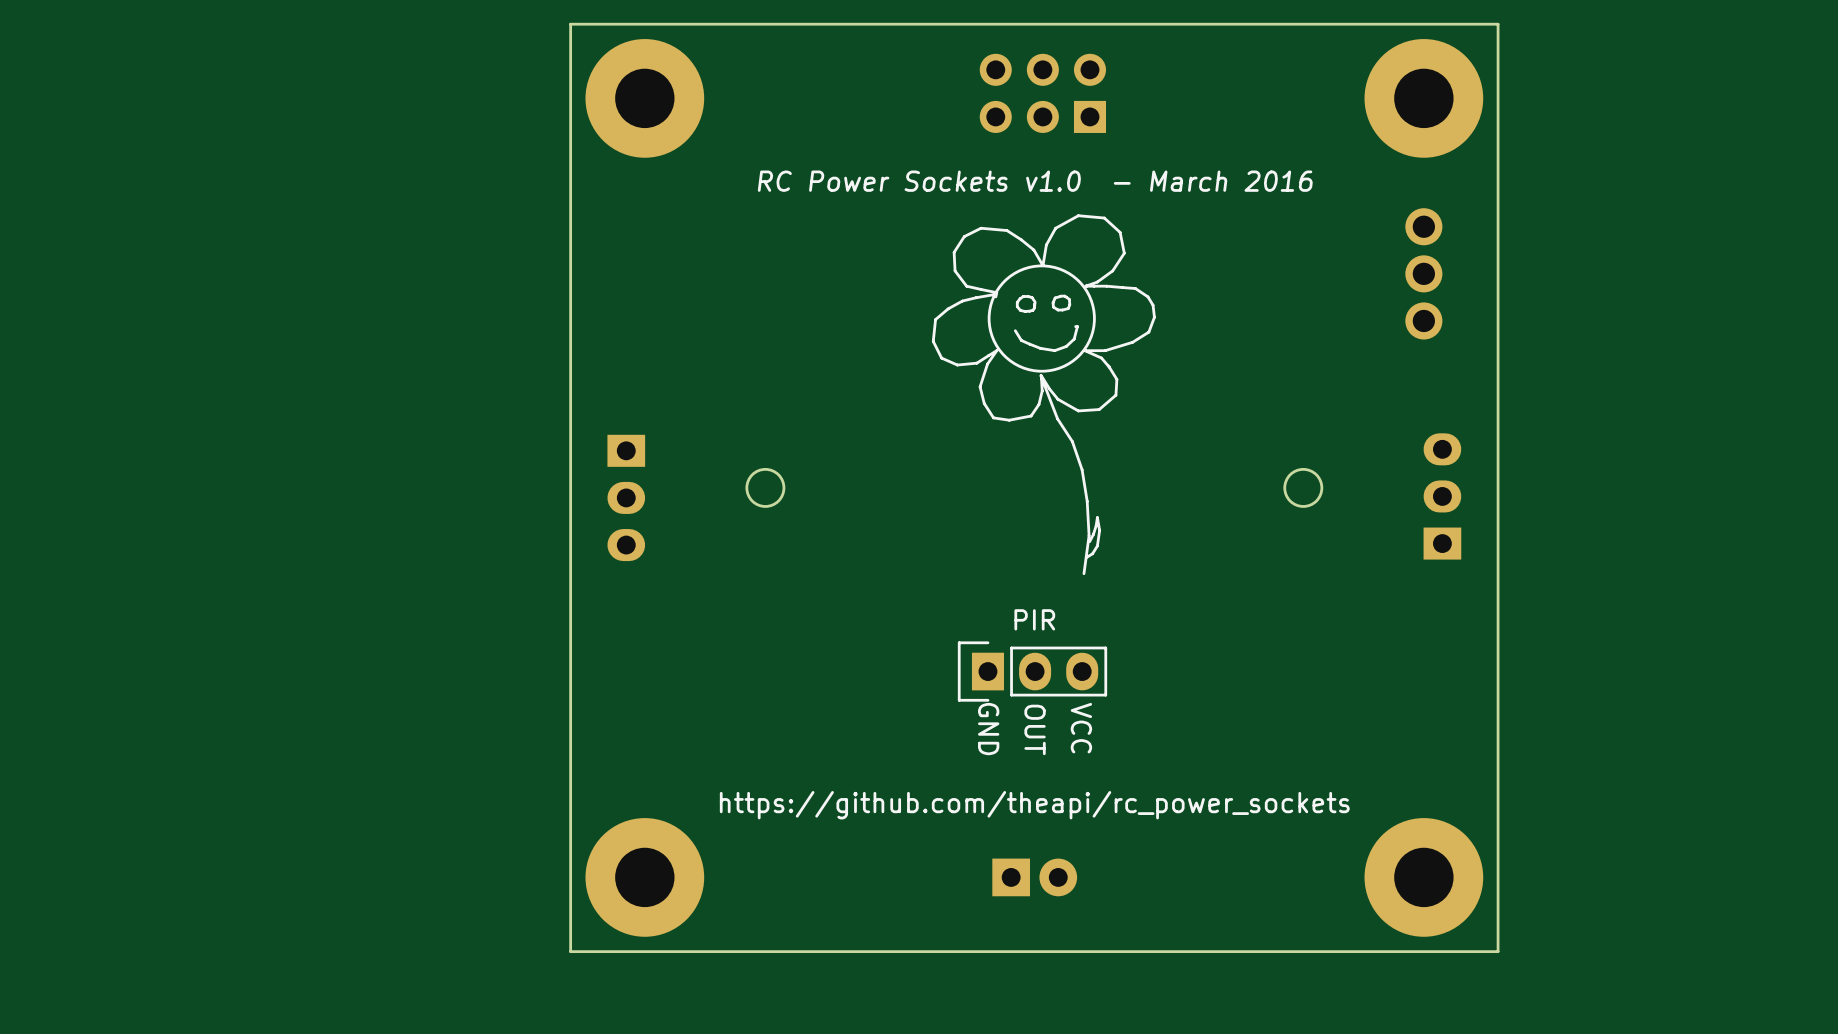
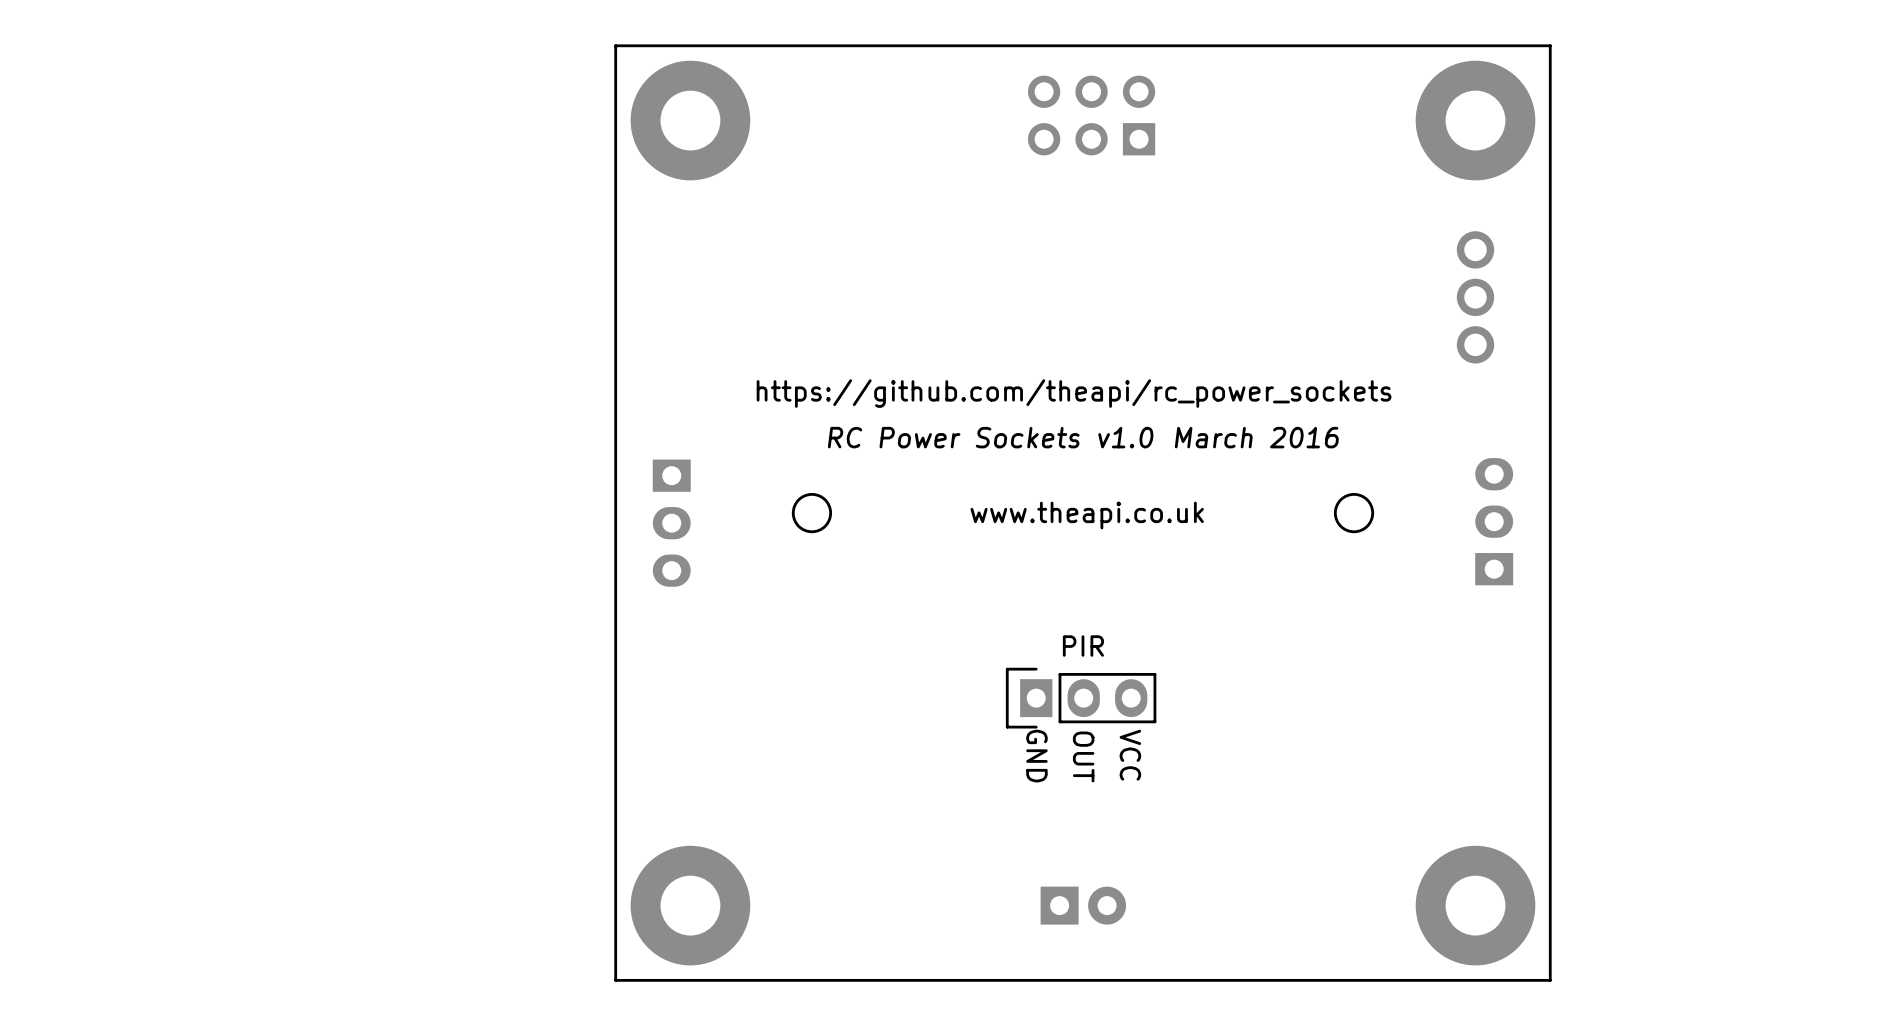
text: RC Power Sockets v1.0 - March 2016 (1035, 181) -> none
drawing: [931, 214, 1156, 576] -> none
text: none -> RC Power Sockets v1.0 (990, 437)
text: none -> March 2016 (1256, 437)
text: none -> www.theapi.co.uk (1087, 515)
text position: https://github.com/theapi/rc_power_sockets (1034, 805) -> https://github.com/theapi/rc_power_sockets (1074, 393)

